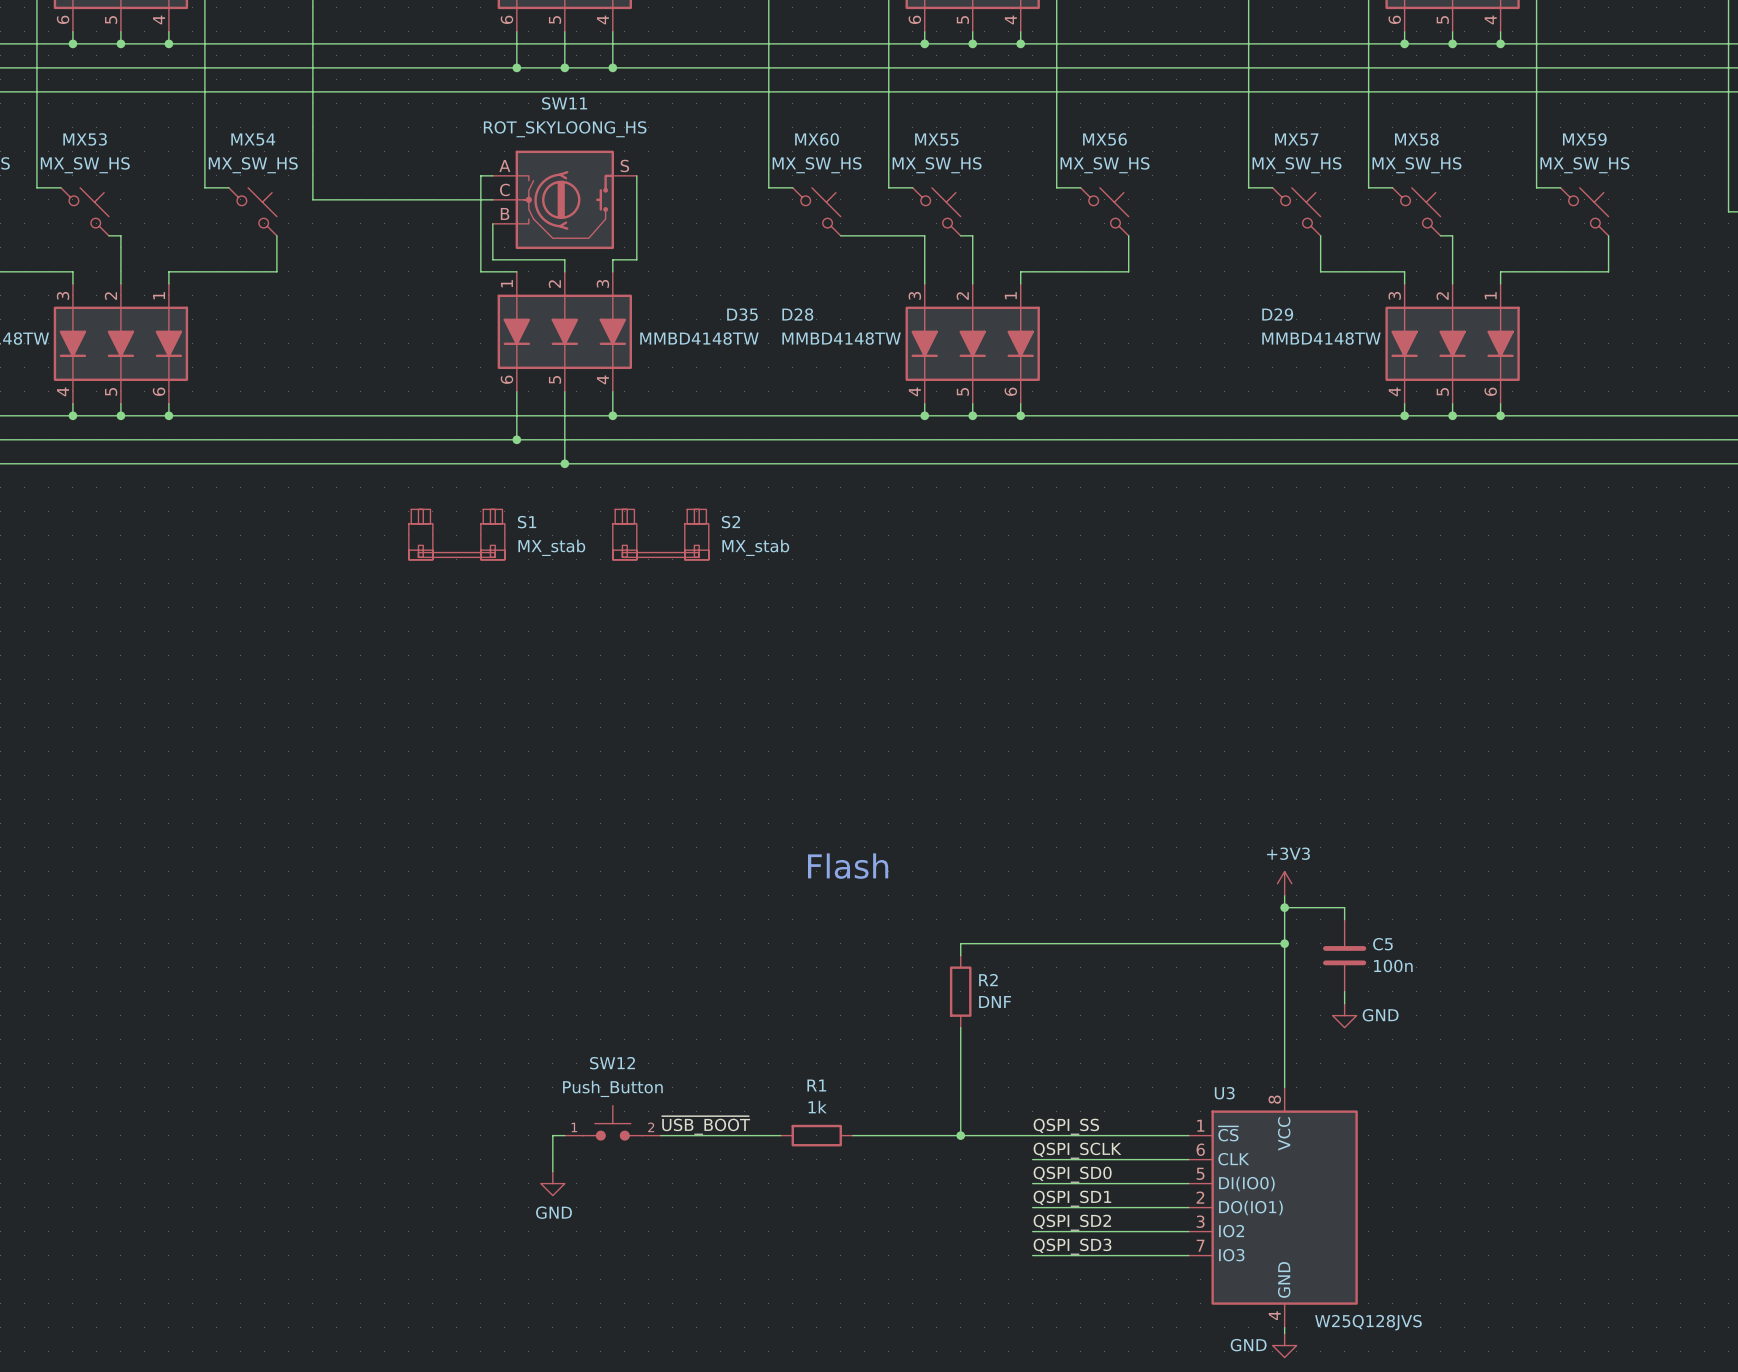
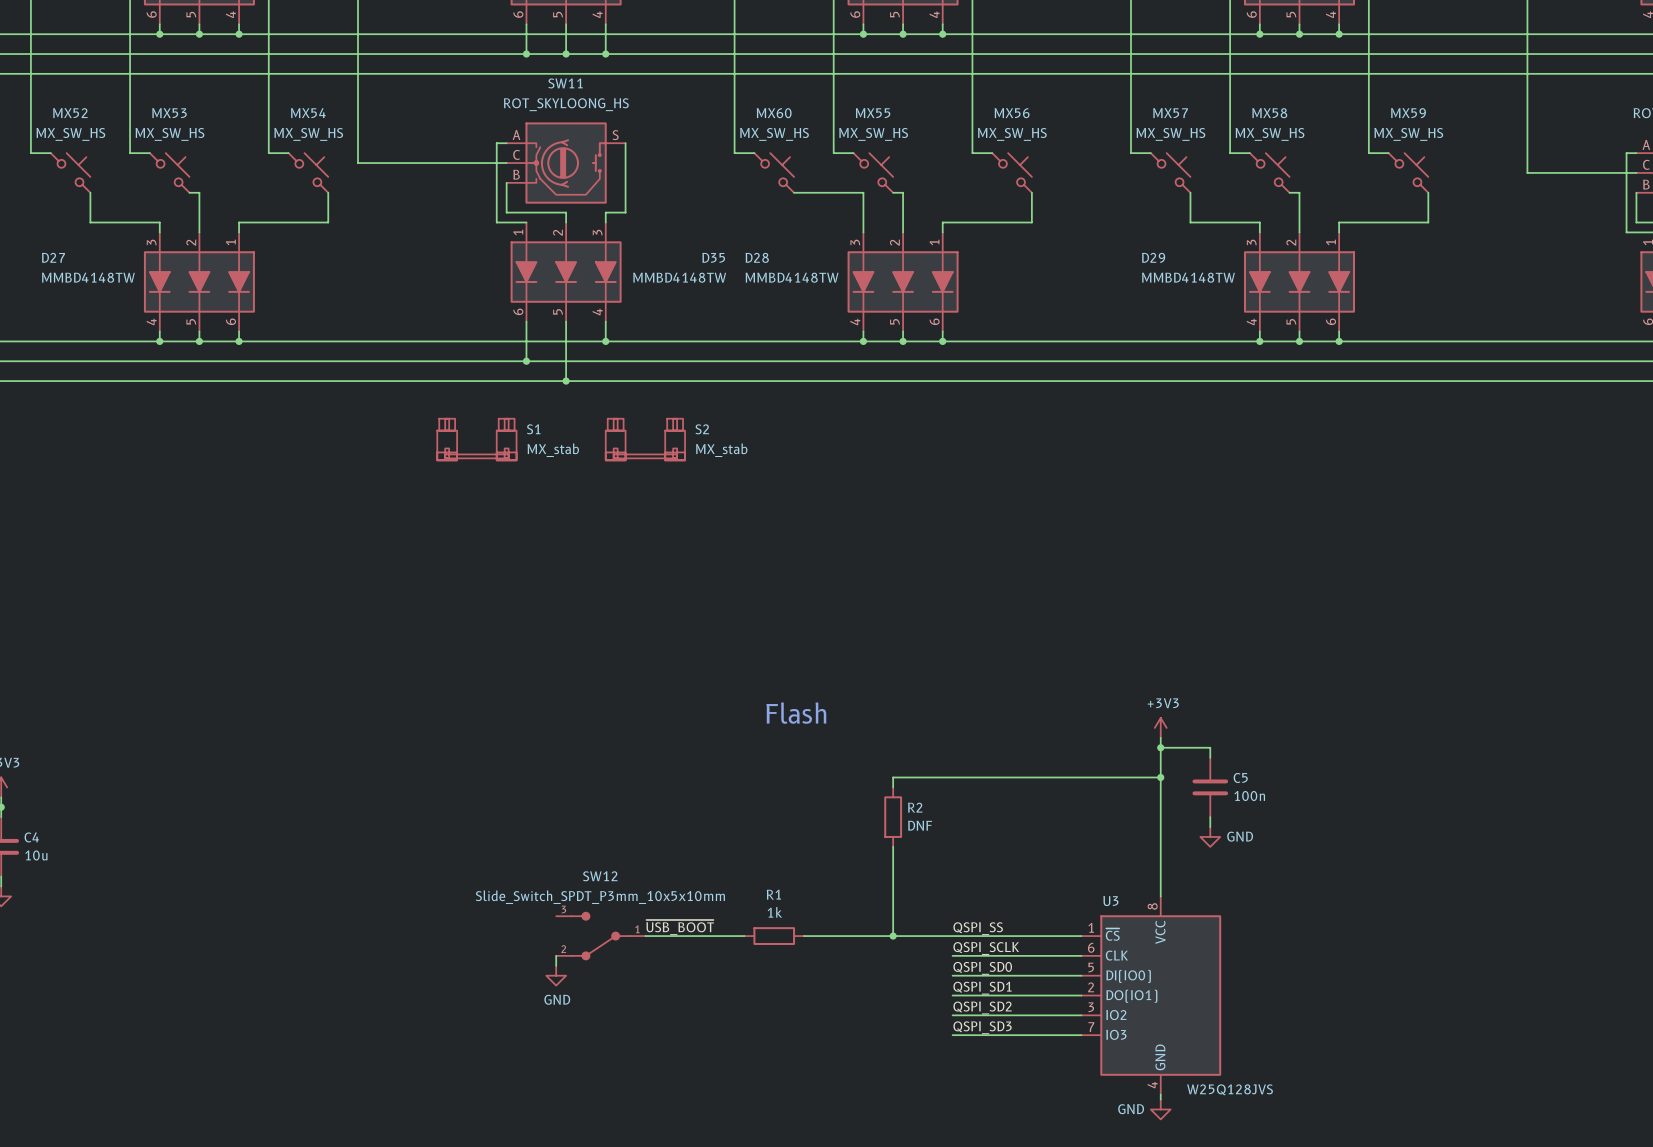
SW12 value: Push_Button (612, 1088) -> Slide_Switch_SPDT_P3mm_10x5x10mm (600, 897)
SW12 symbol: [564, 1105, 661, 1140] -> [556, 912, 646, 960]
wire: (564, 1135) (552, 1135) (552, 1159) -> none

